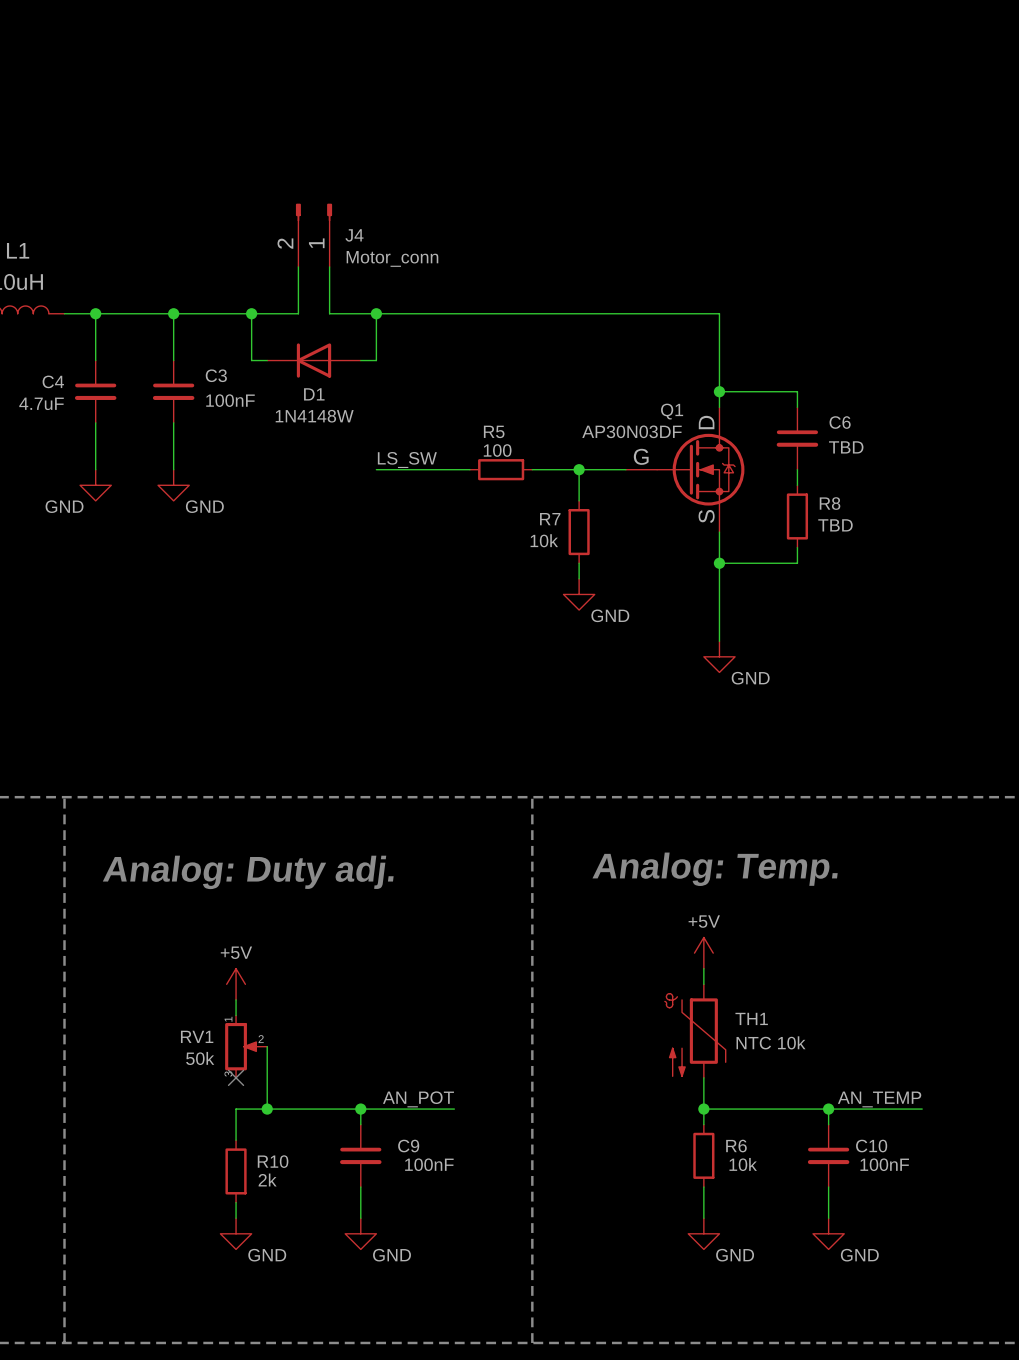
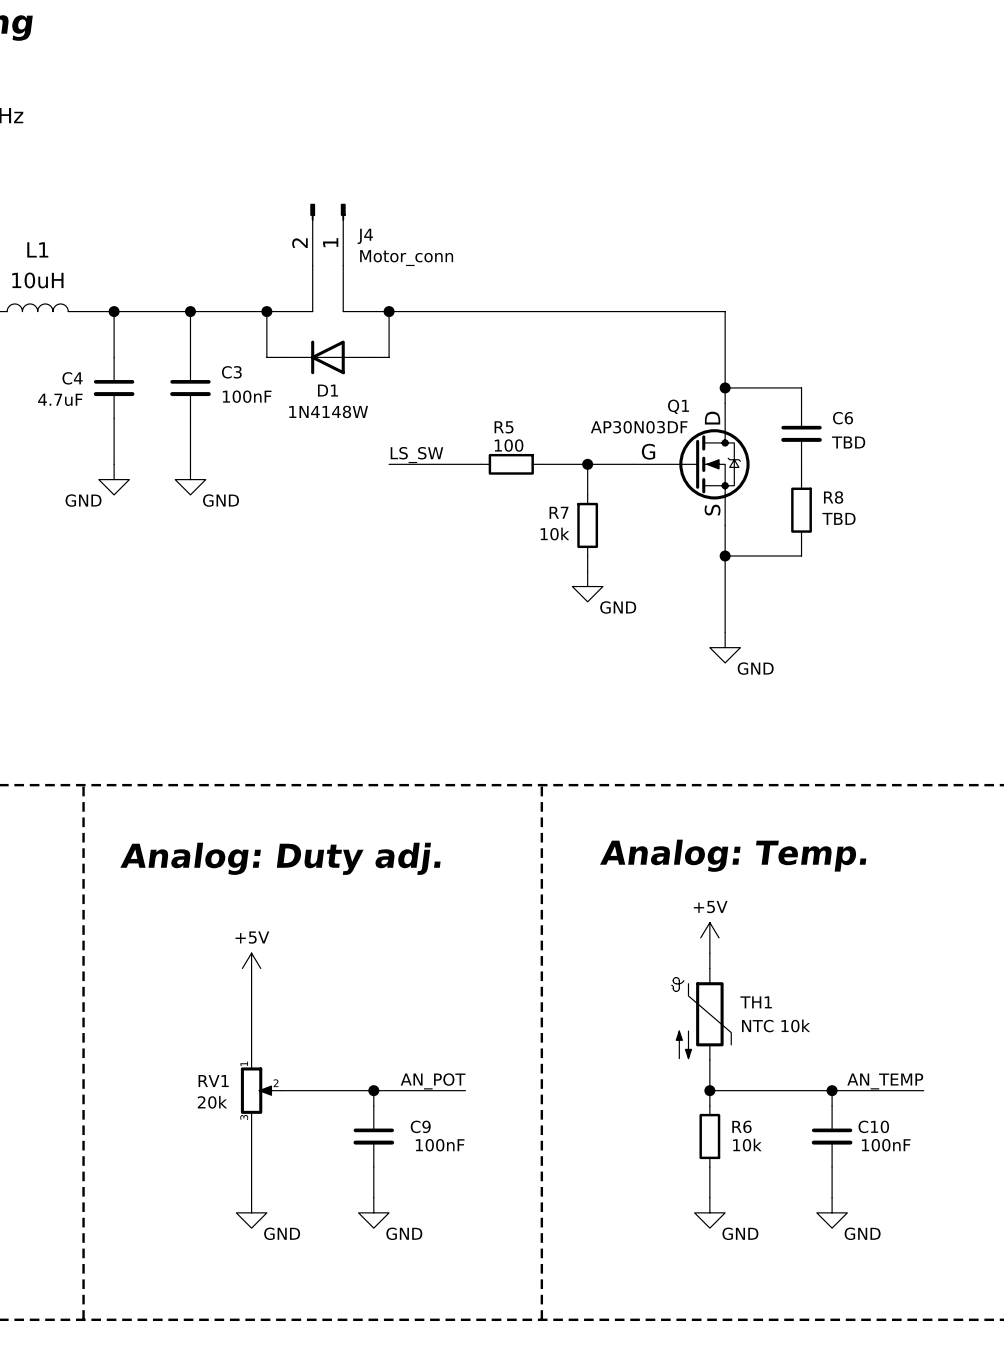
wire: none -> (251, 999) (251, 1060)
RV1 position: (246, 1046) -> (261, 1090)
wire: (267, 1046) (267, 1109) (236, 1109) (236, 1140) -> (251, 1182) (251, 1121)
RV1 value: 50k (200, 1058) -> 20k (212, 1102)
no-connect mark: (236, 1077) -> none
junction: (267, 1109) -> none
R10: 2k (236, 1171) -> none

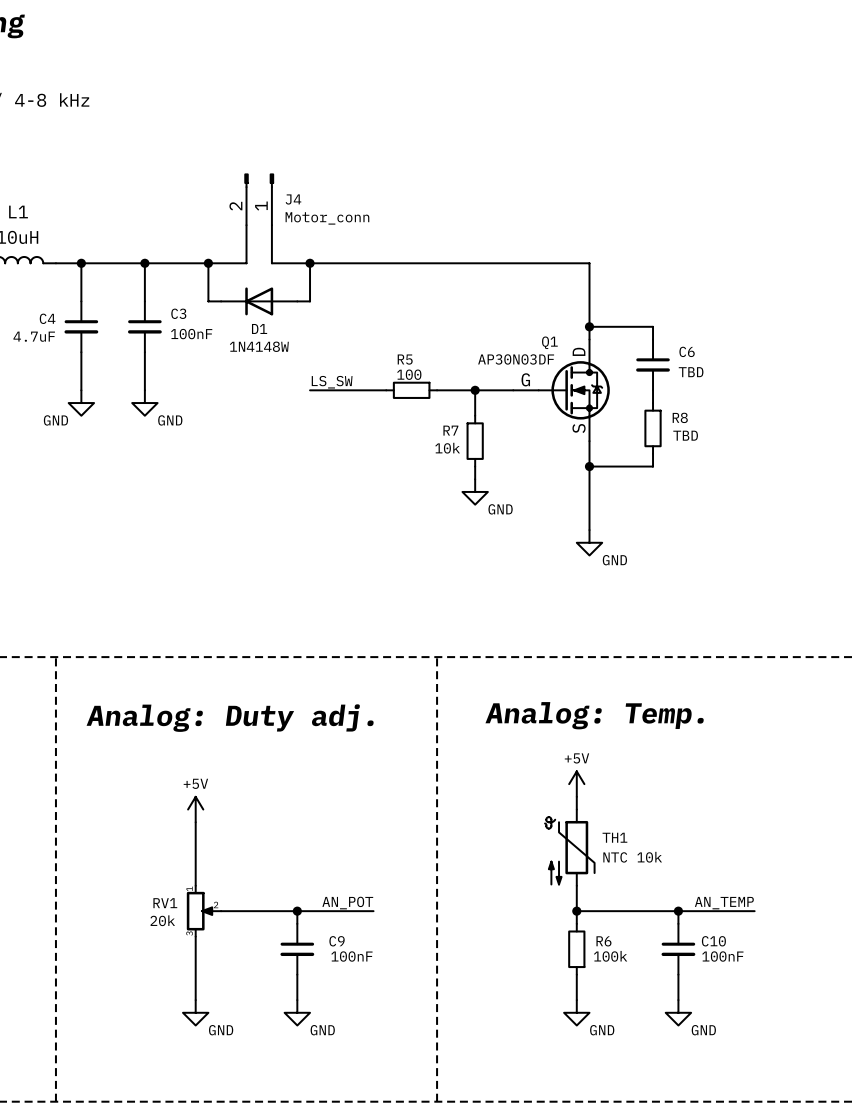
R6 value: 10k (747, 1145) -> 100k (610, 956)

